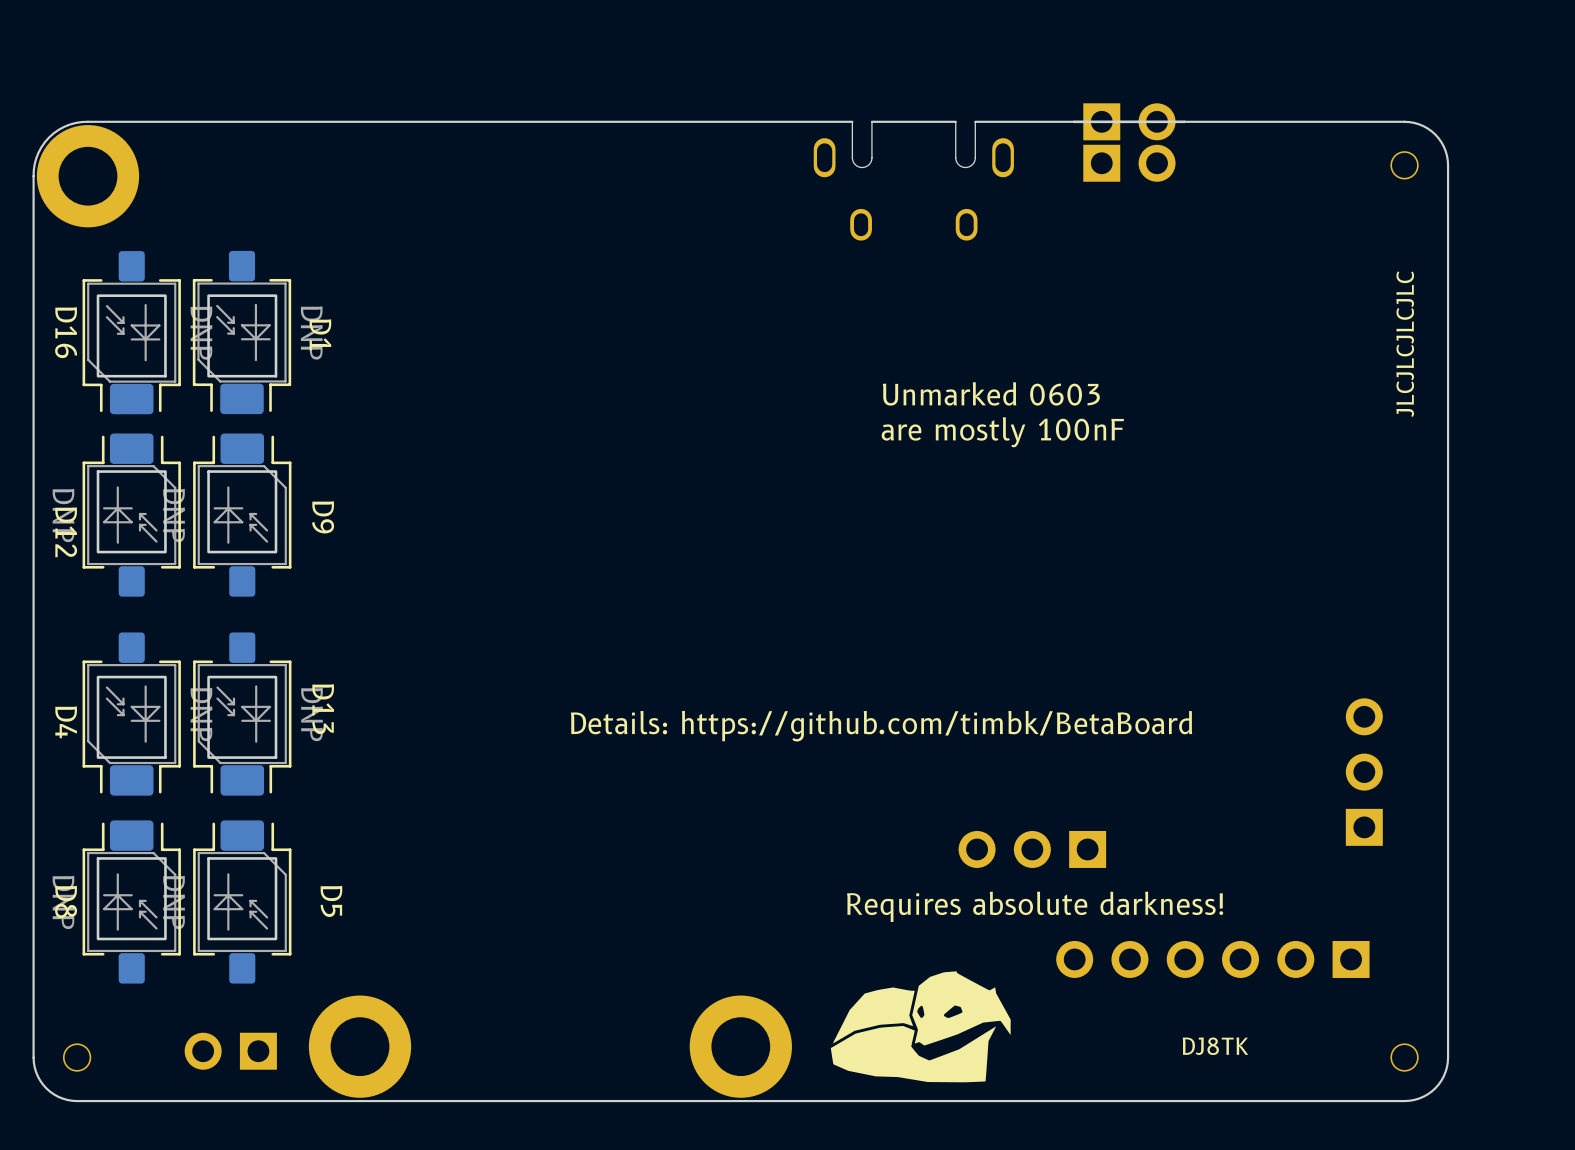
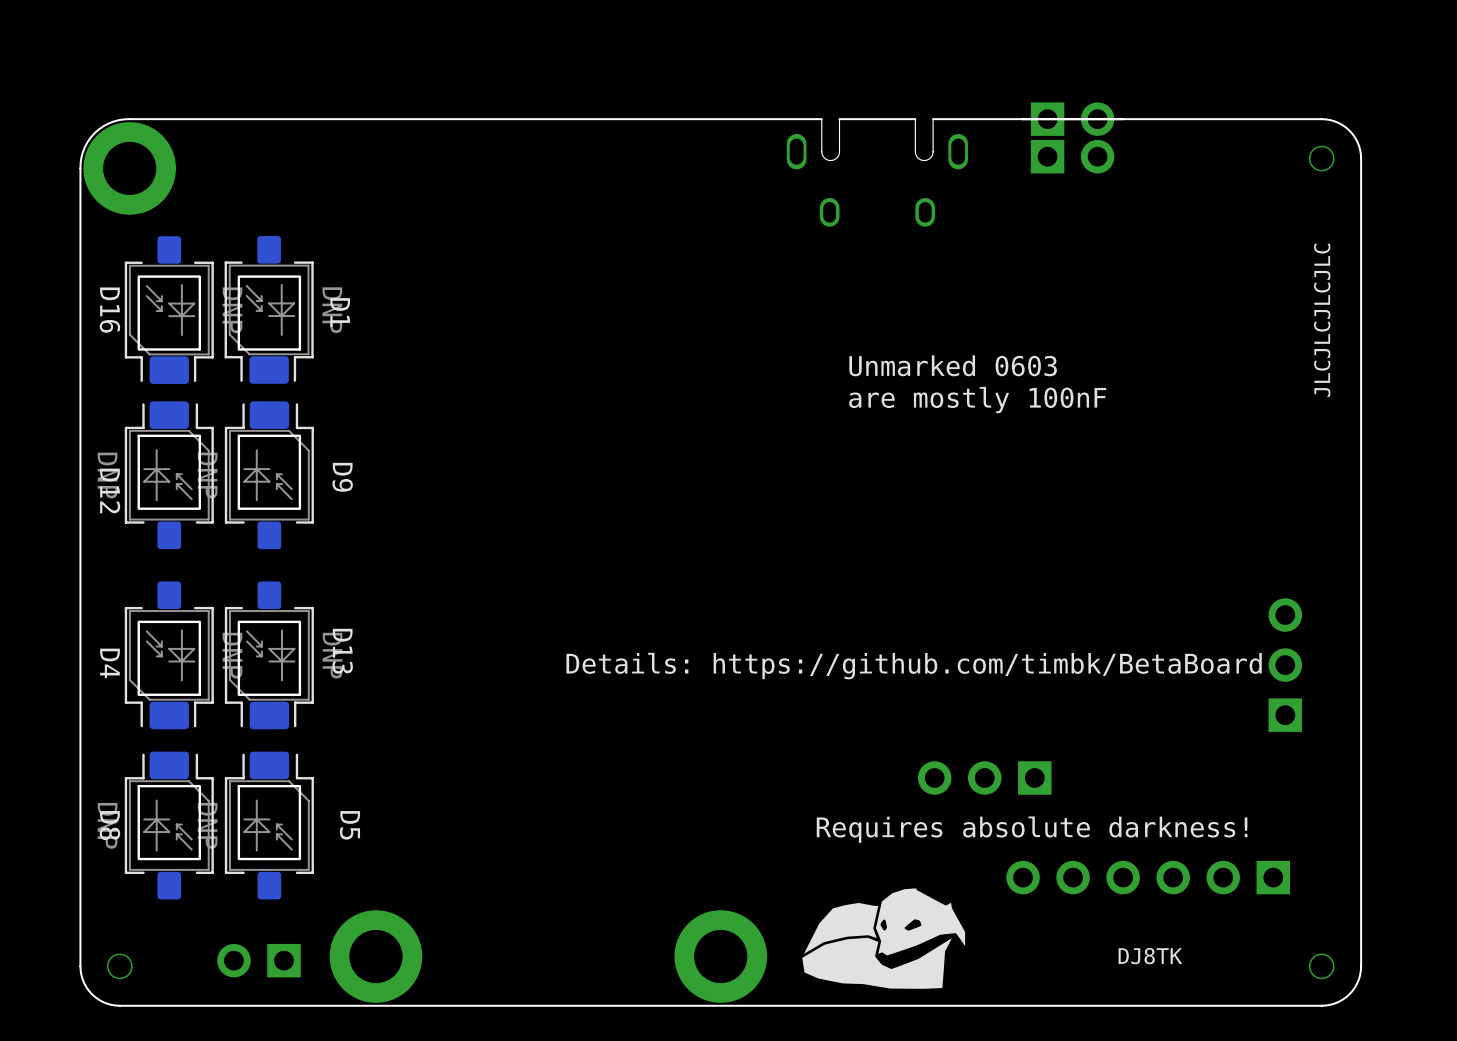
part position: (1364, 772) -> (1285, 665)

